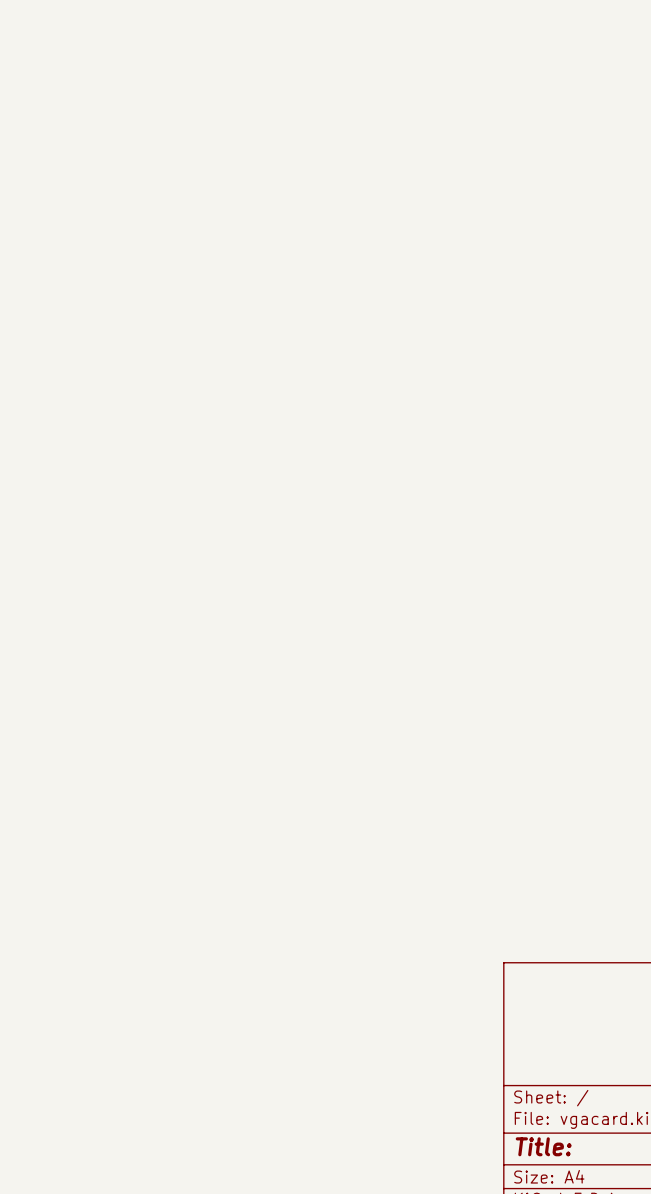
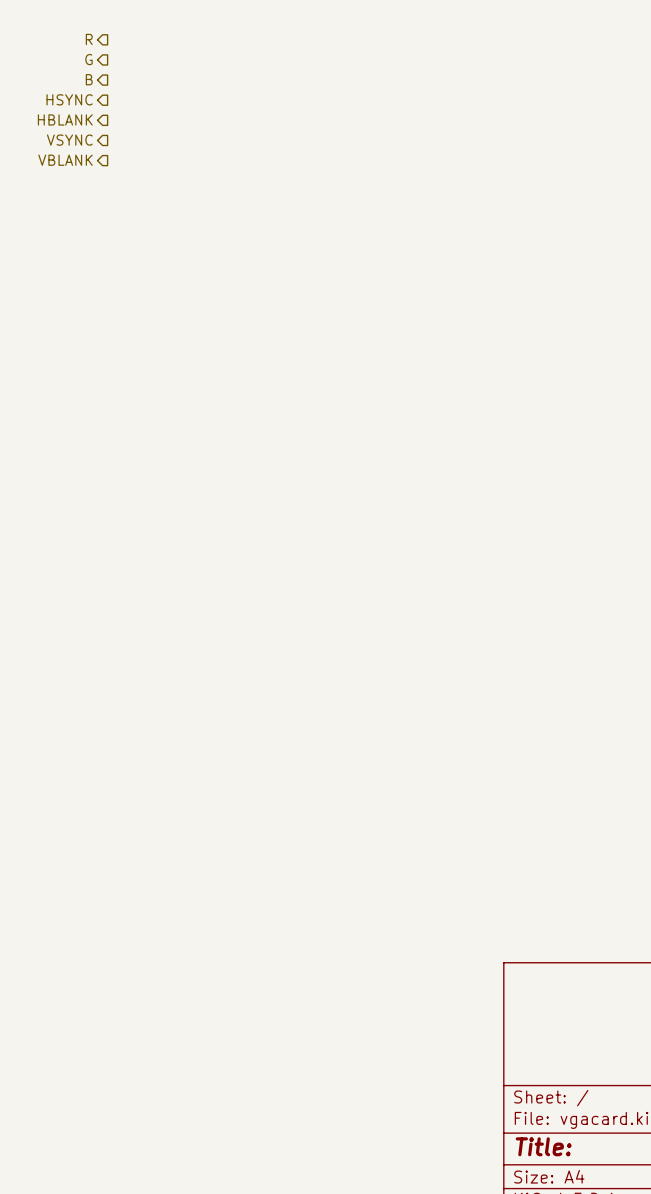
hierarchical label: none -> R (89, 39)
hierarchical label: none -> G (89, 59)
hierarchical label: none -> B (89, 79)
hierarchical label: none -> HSYNC (69, 99)
hierarchical label: none -> HBLANK (65, 119)
hierarchical label: none -> VSYNC (69, 140)
hierarchical label: none -> VBLANK (65, 160)

